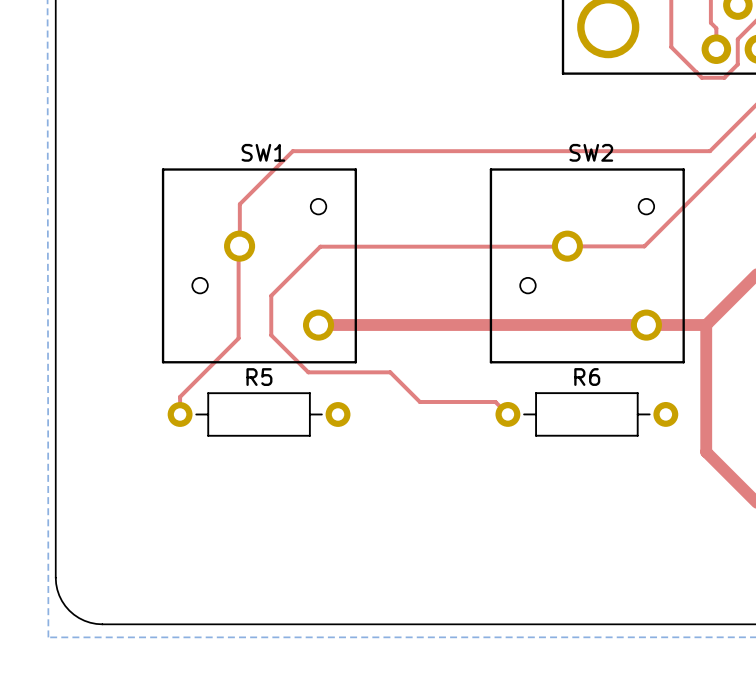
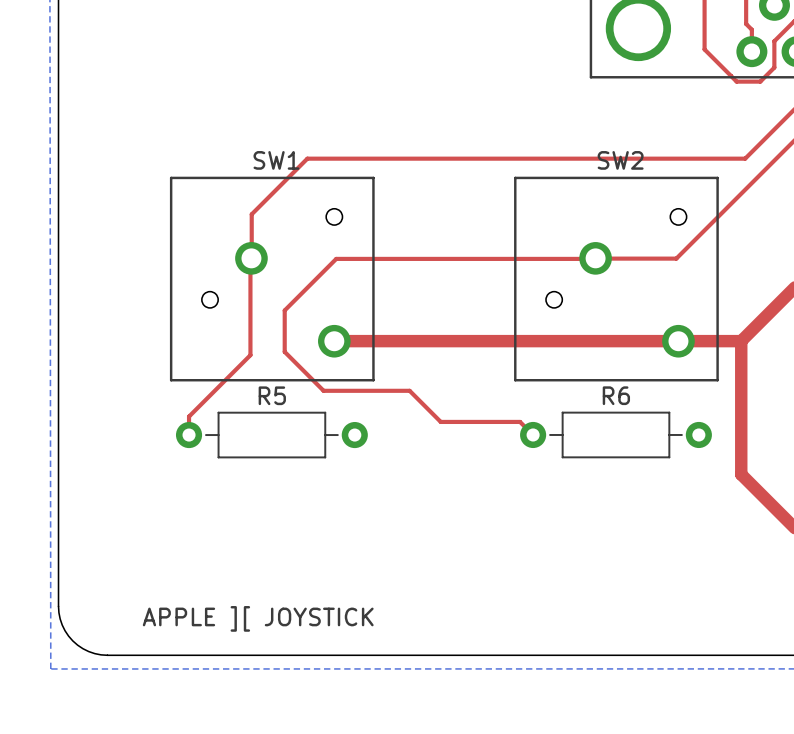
text: none -> APPLE ][ JOYSTICK (258, 618)

